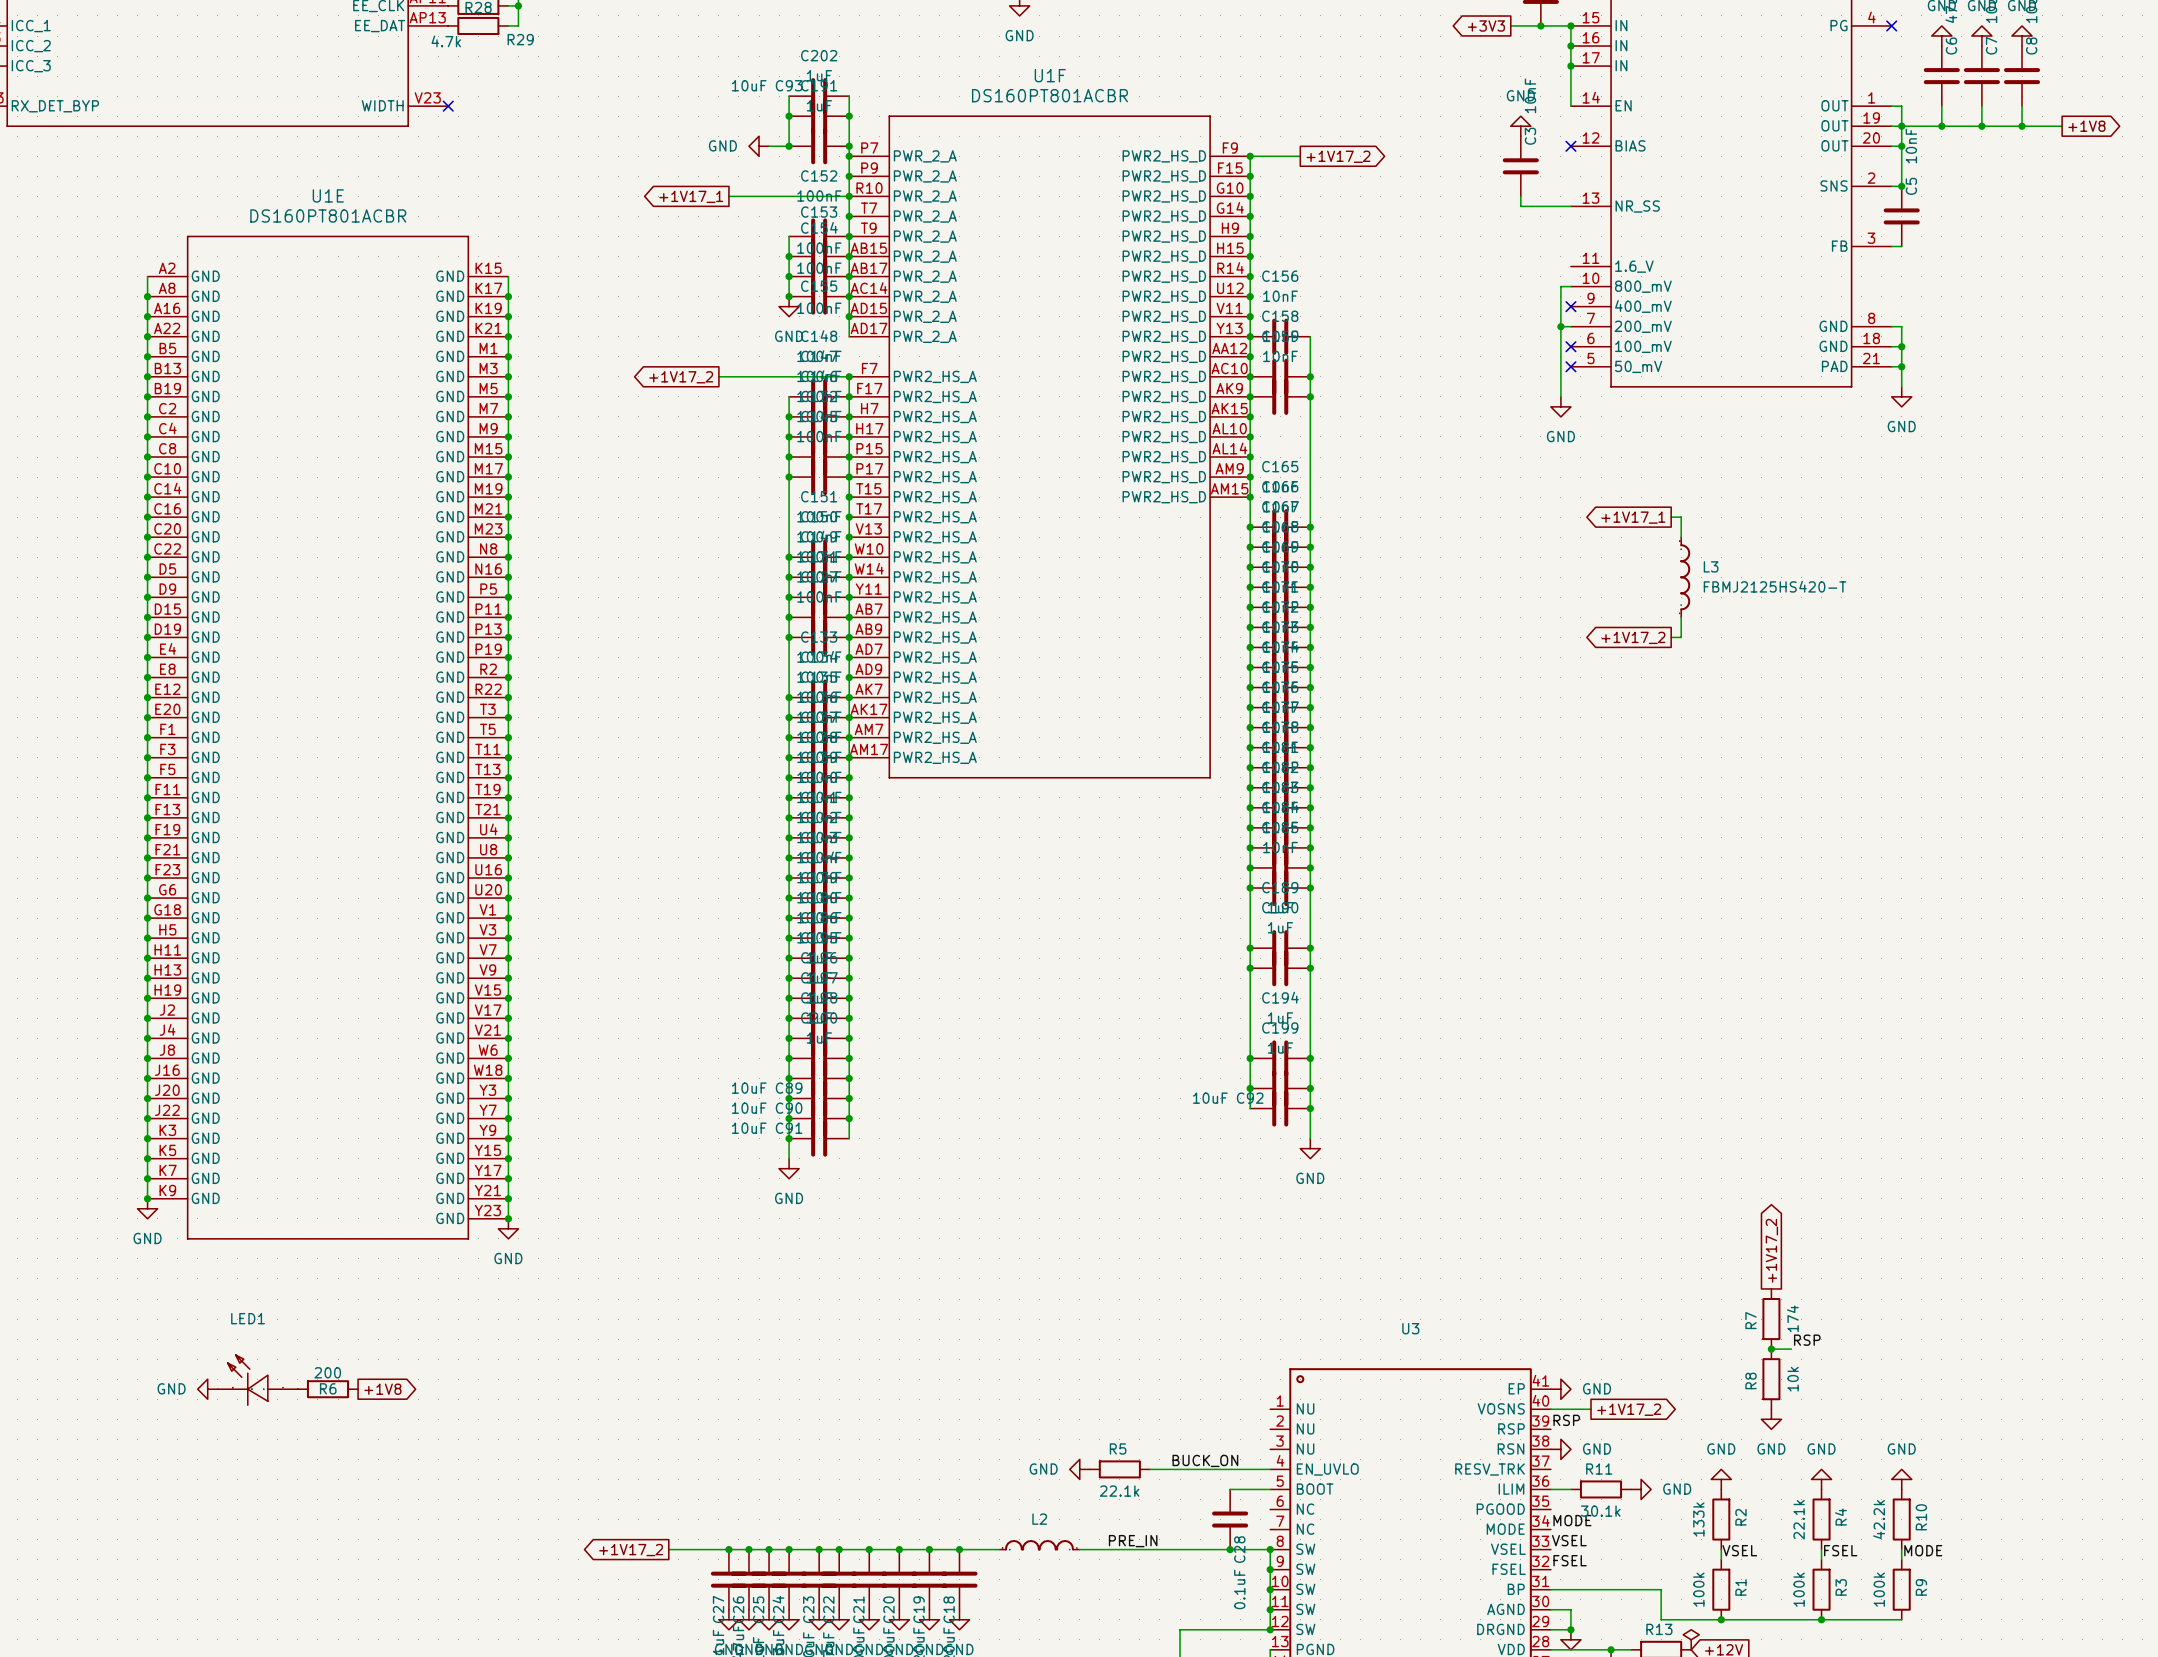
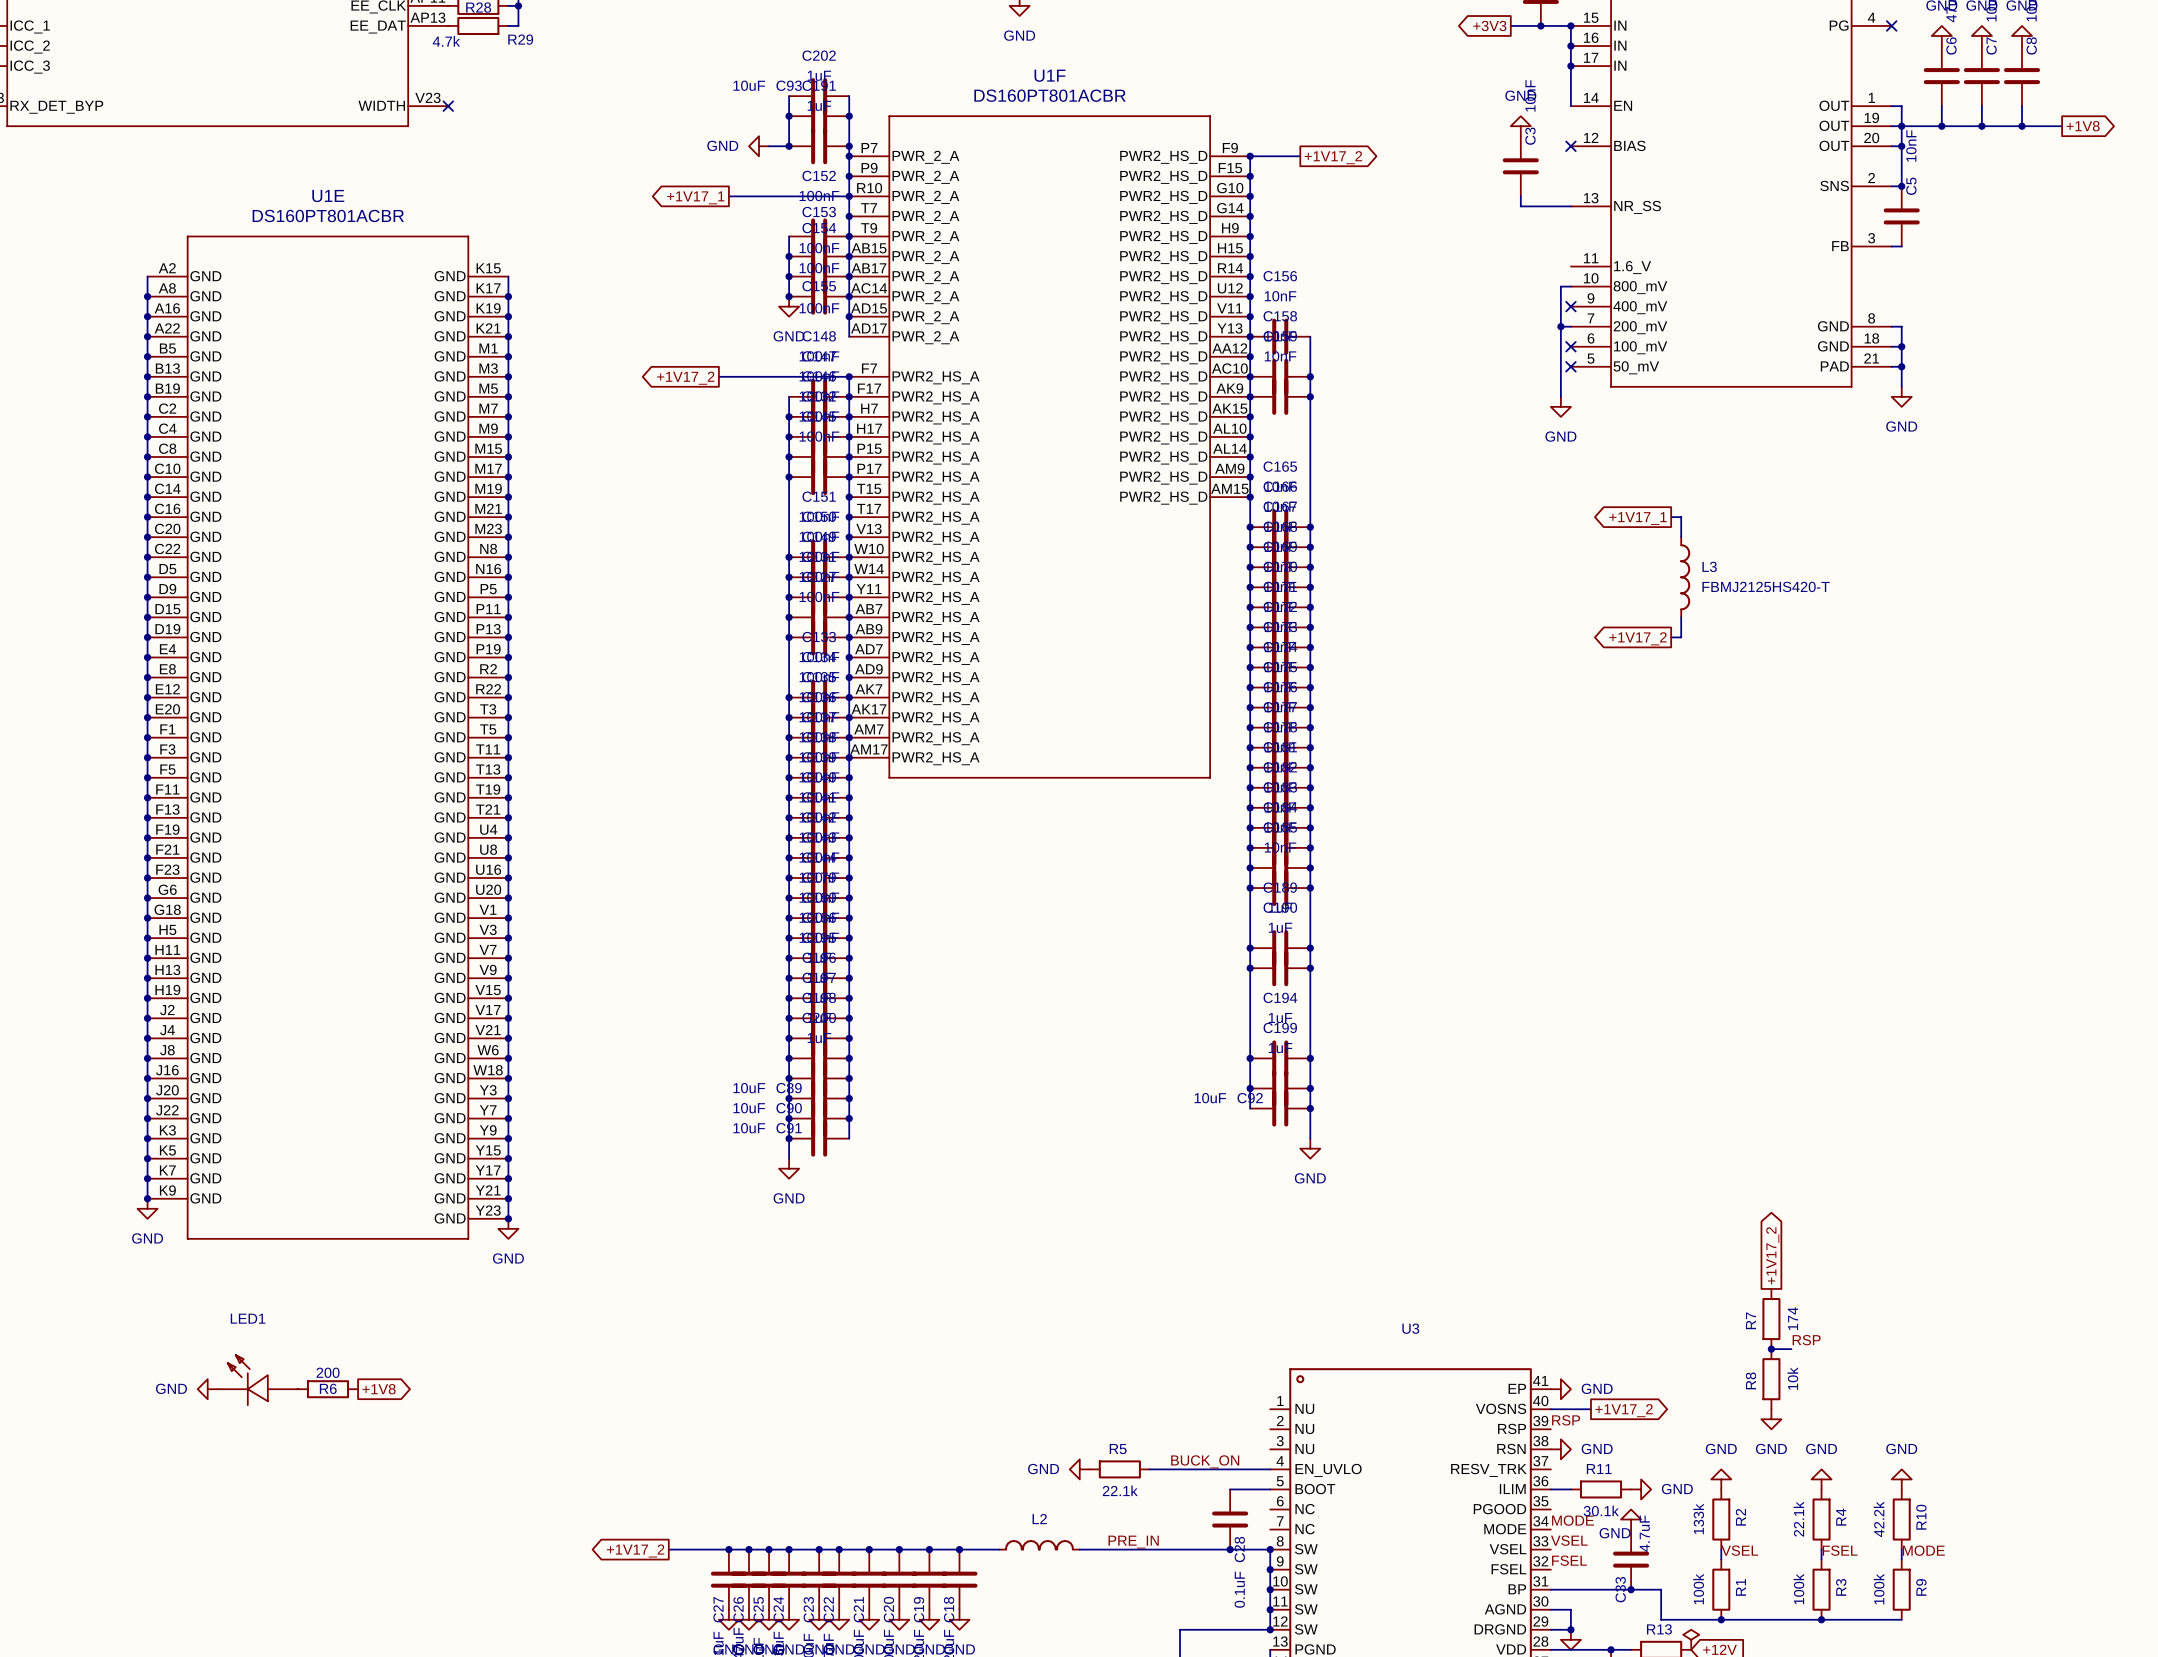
power symbol: none -> GND (1631, 1519)
C33: none -> 4.7uF (1631, 1559)
junction: none -> (1631, 1589)

